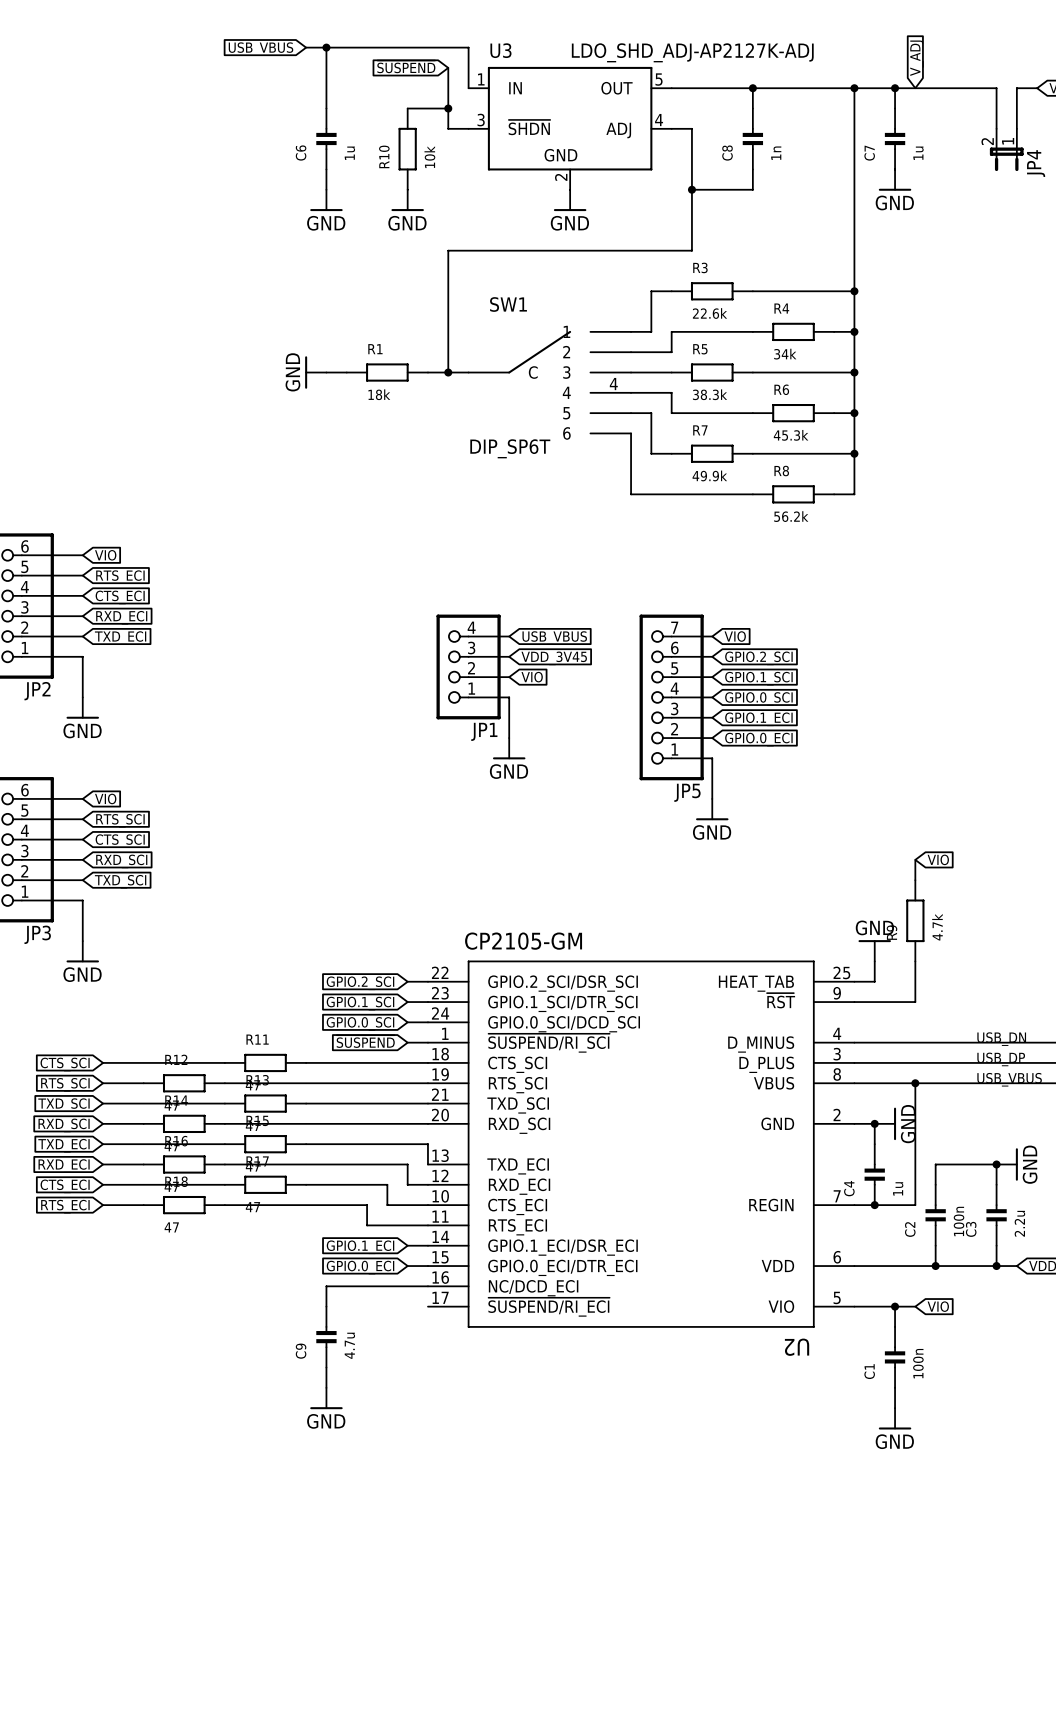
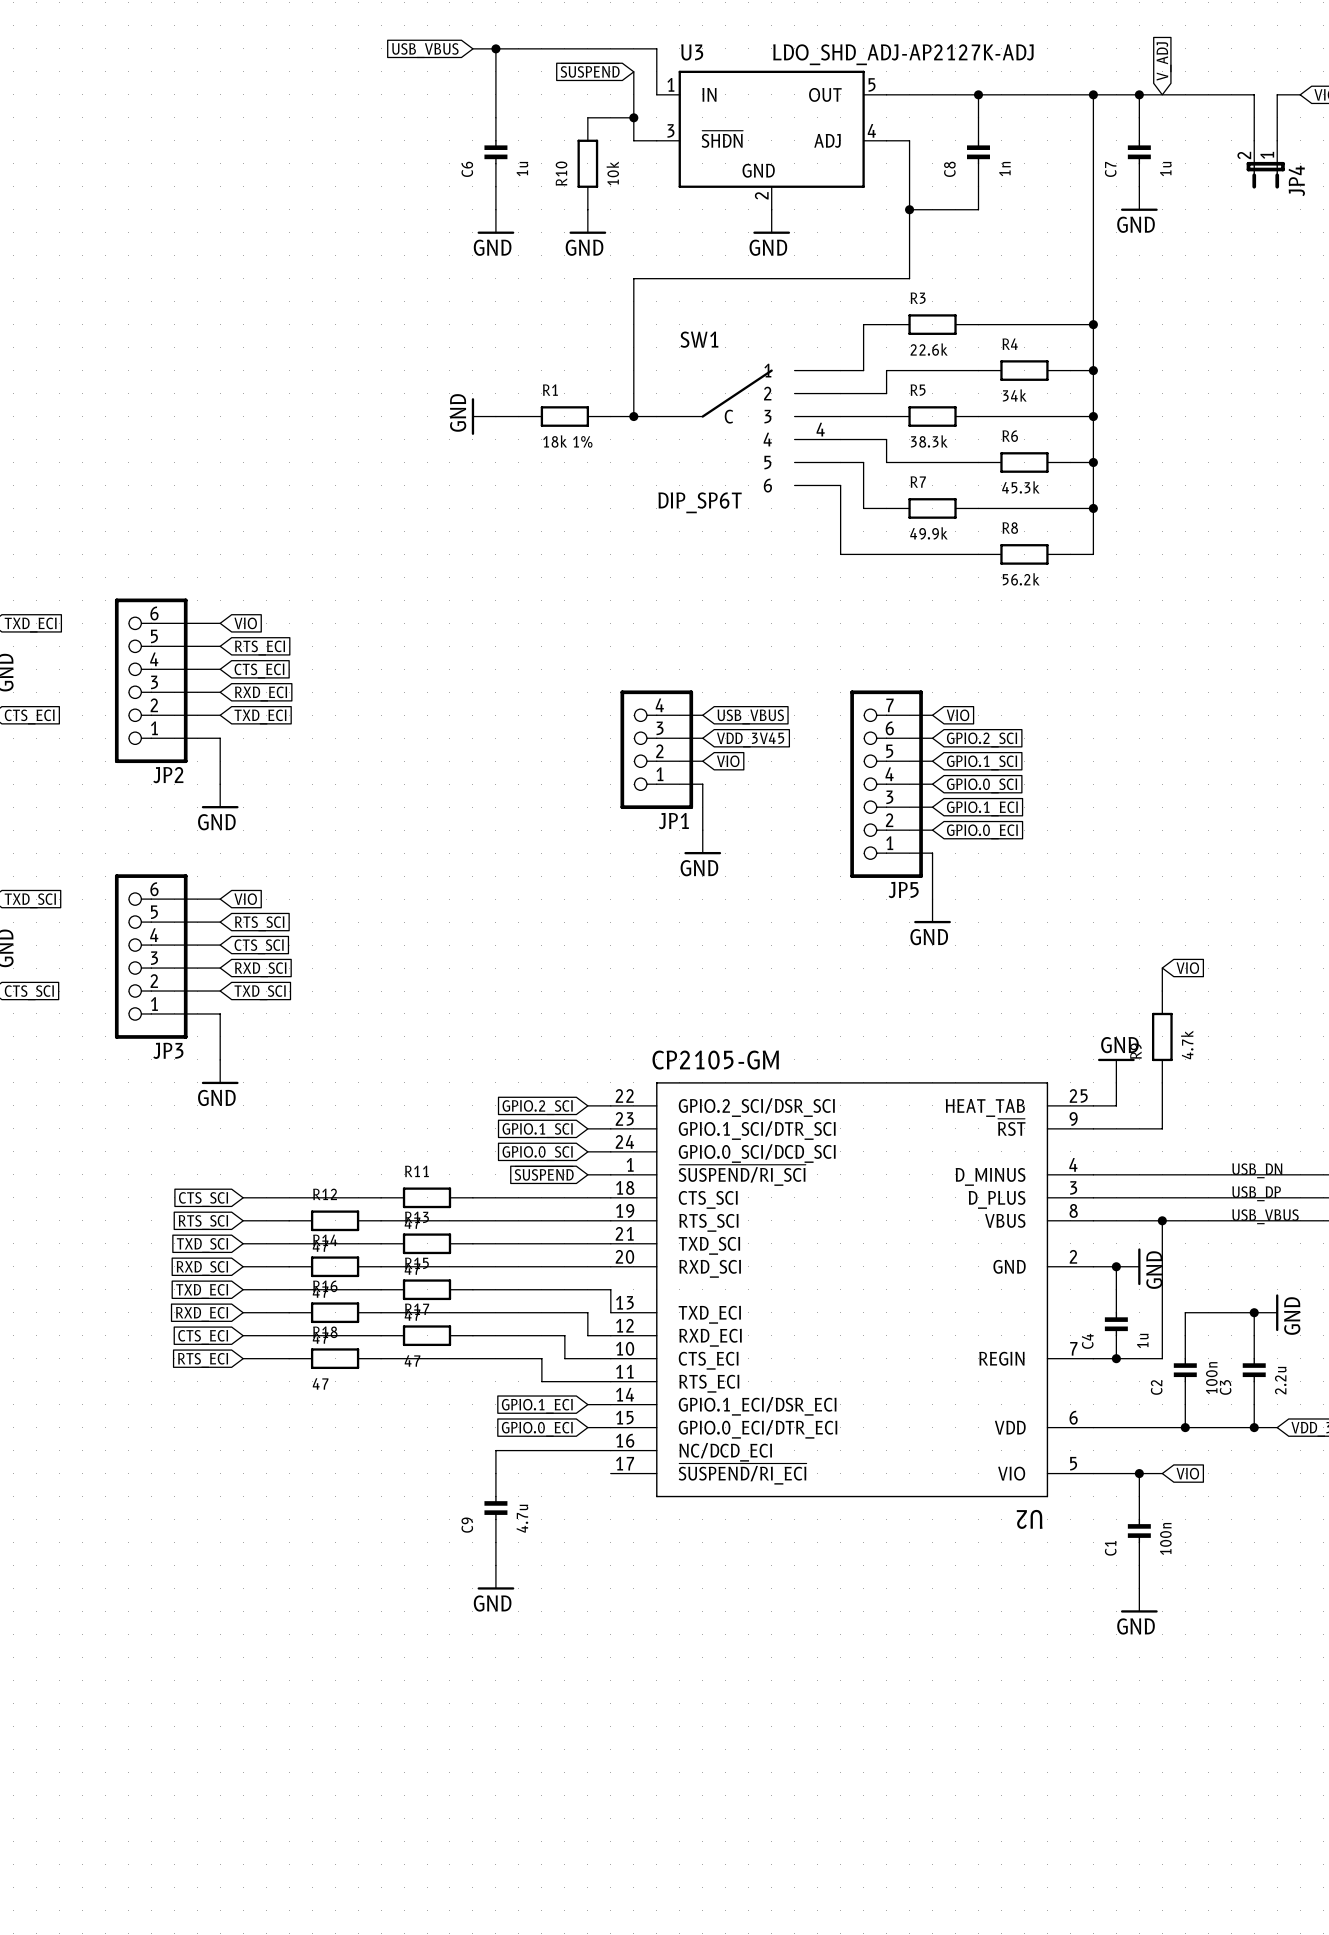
R1 value: 18k (379, 394) -> 18k 1% (567, 441)

